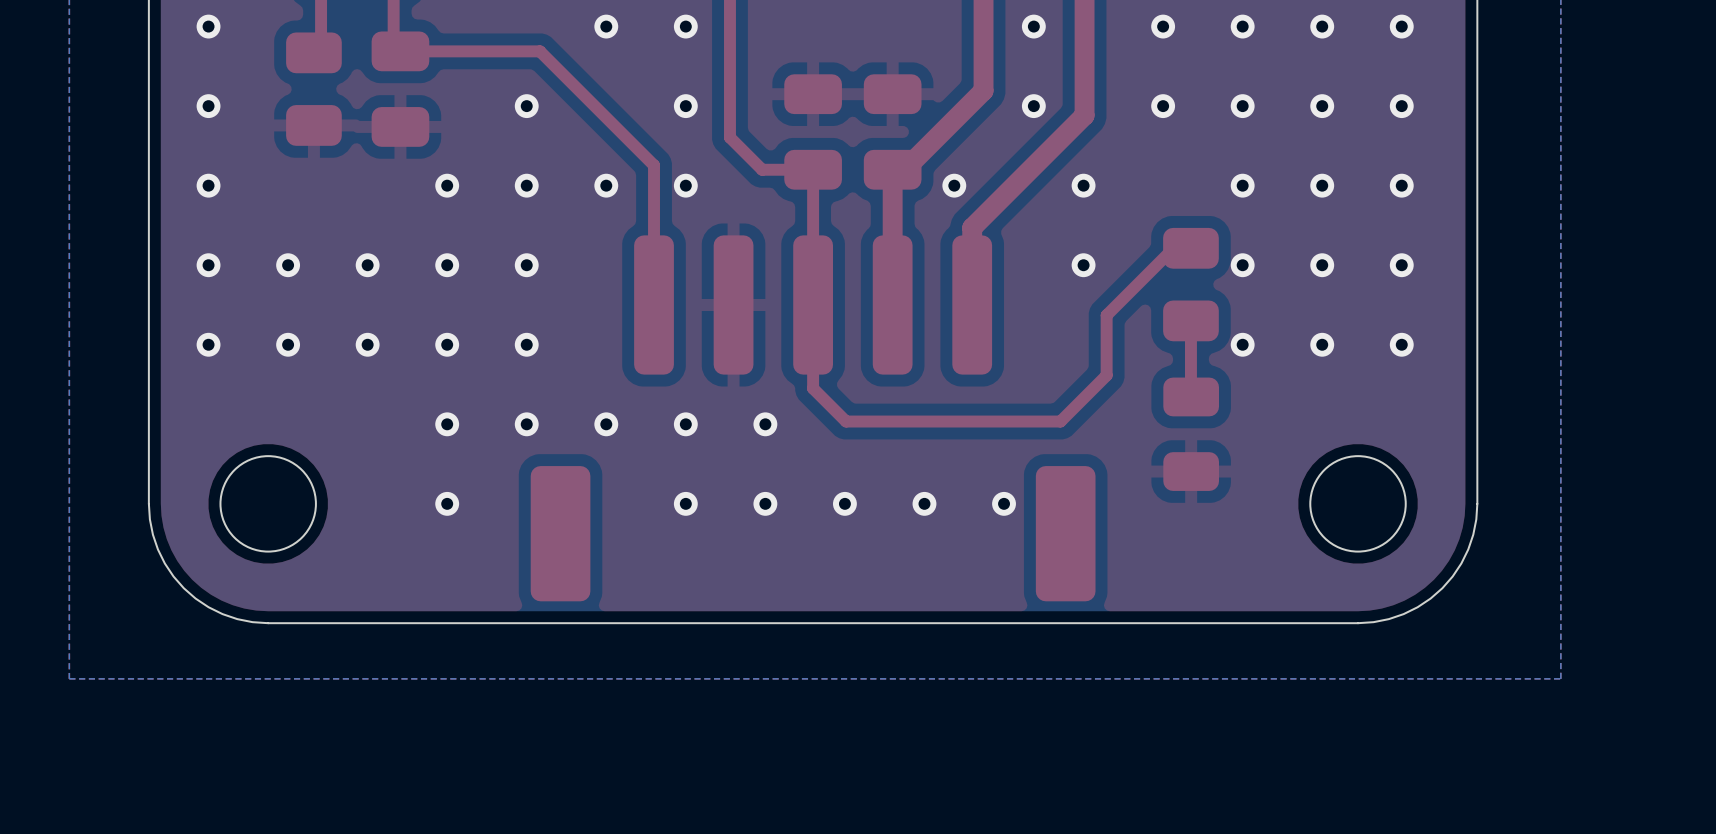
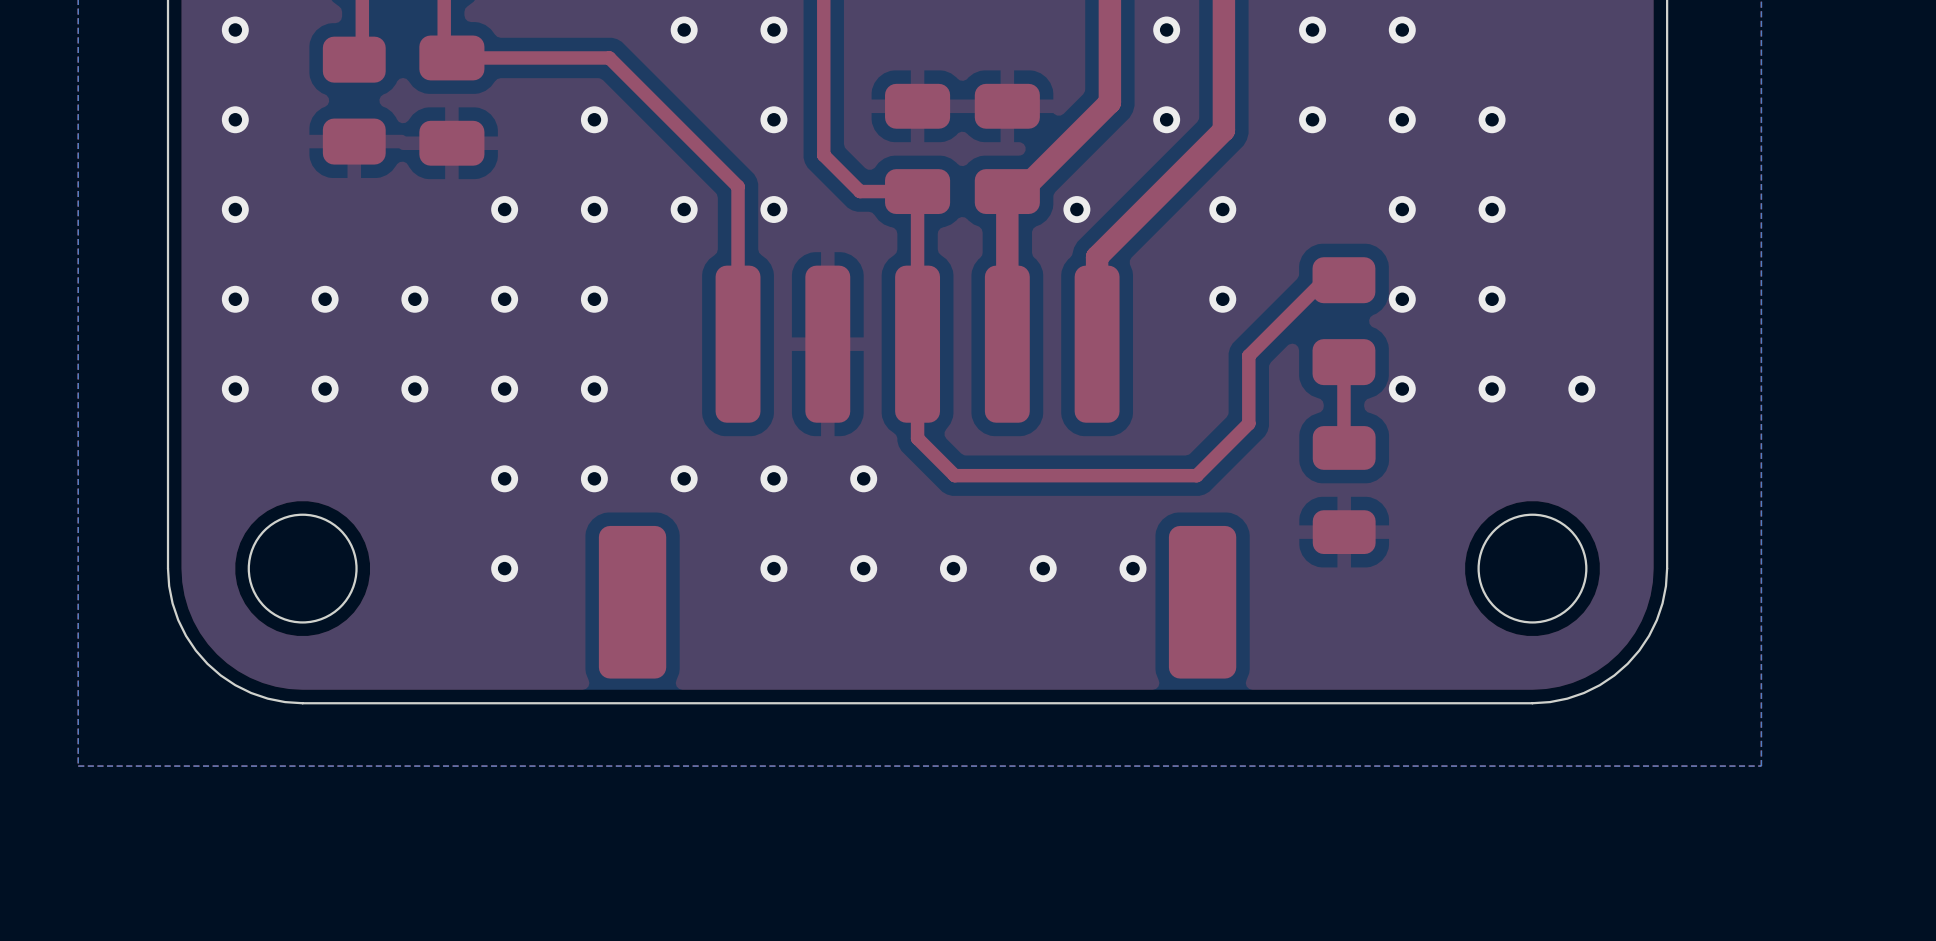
via: (1322, 26) -> none
via: (1401, 26) -> none
via: (1401, 106) -> none
via: (1401, 185) -> none
via: (1401, 265) -> none

